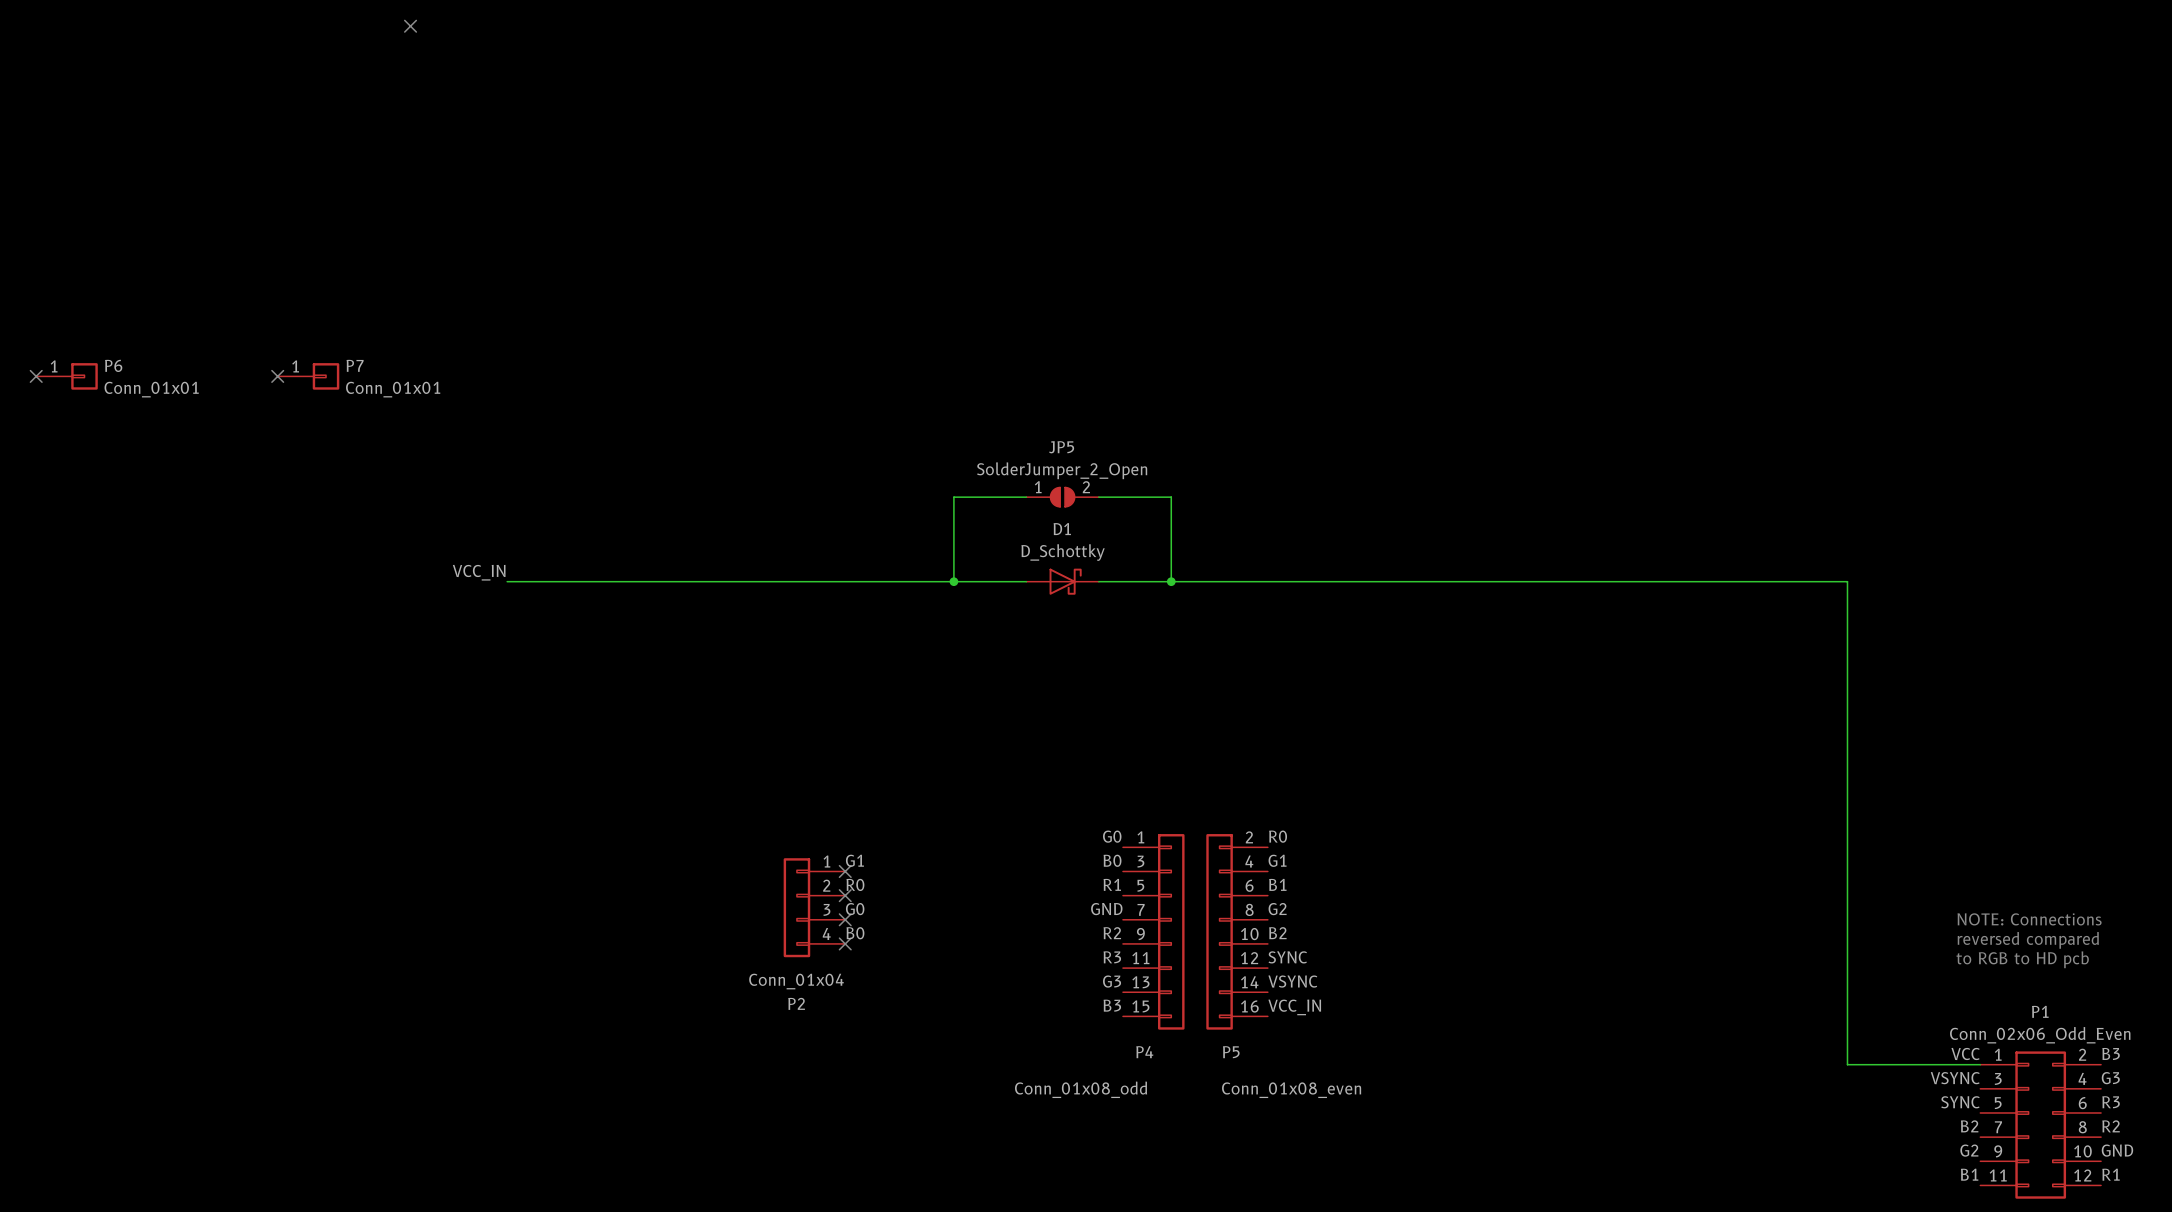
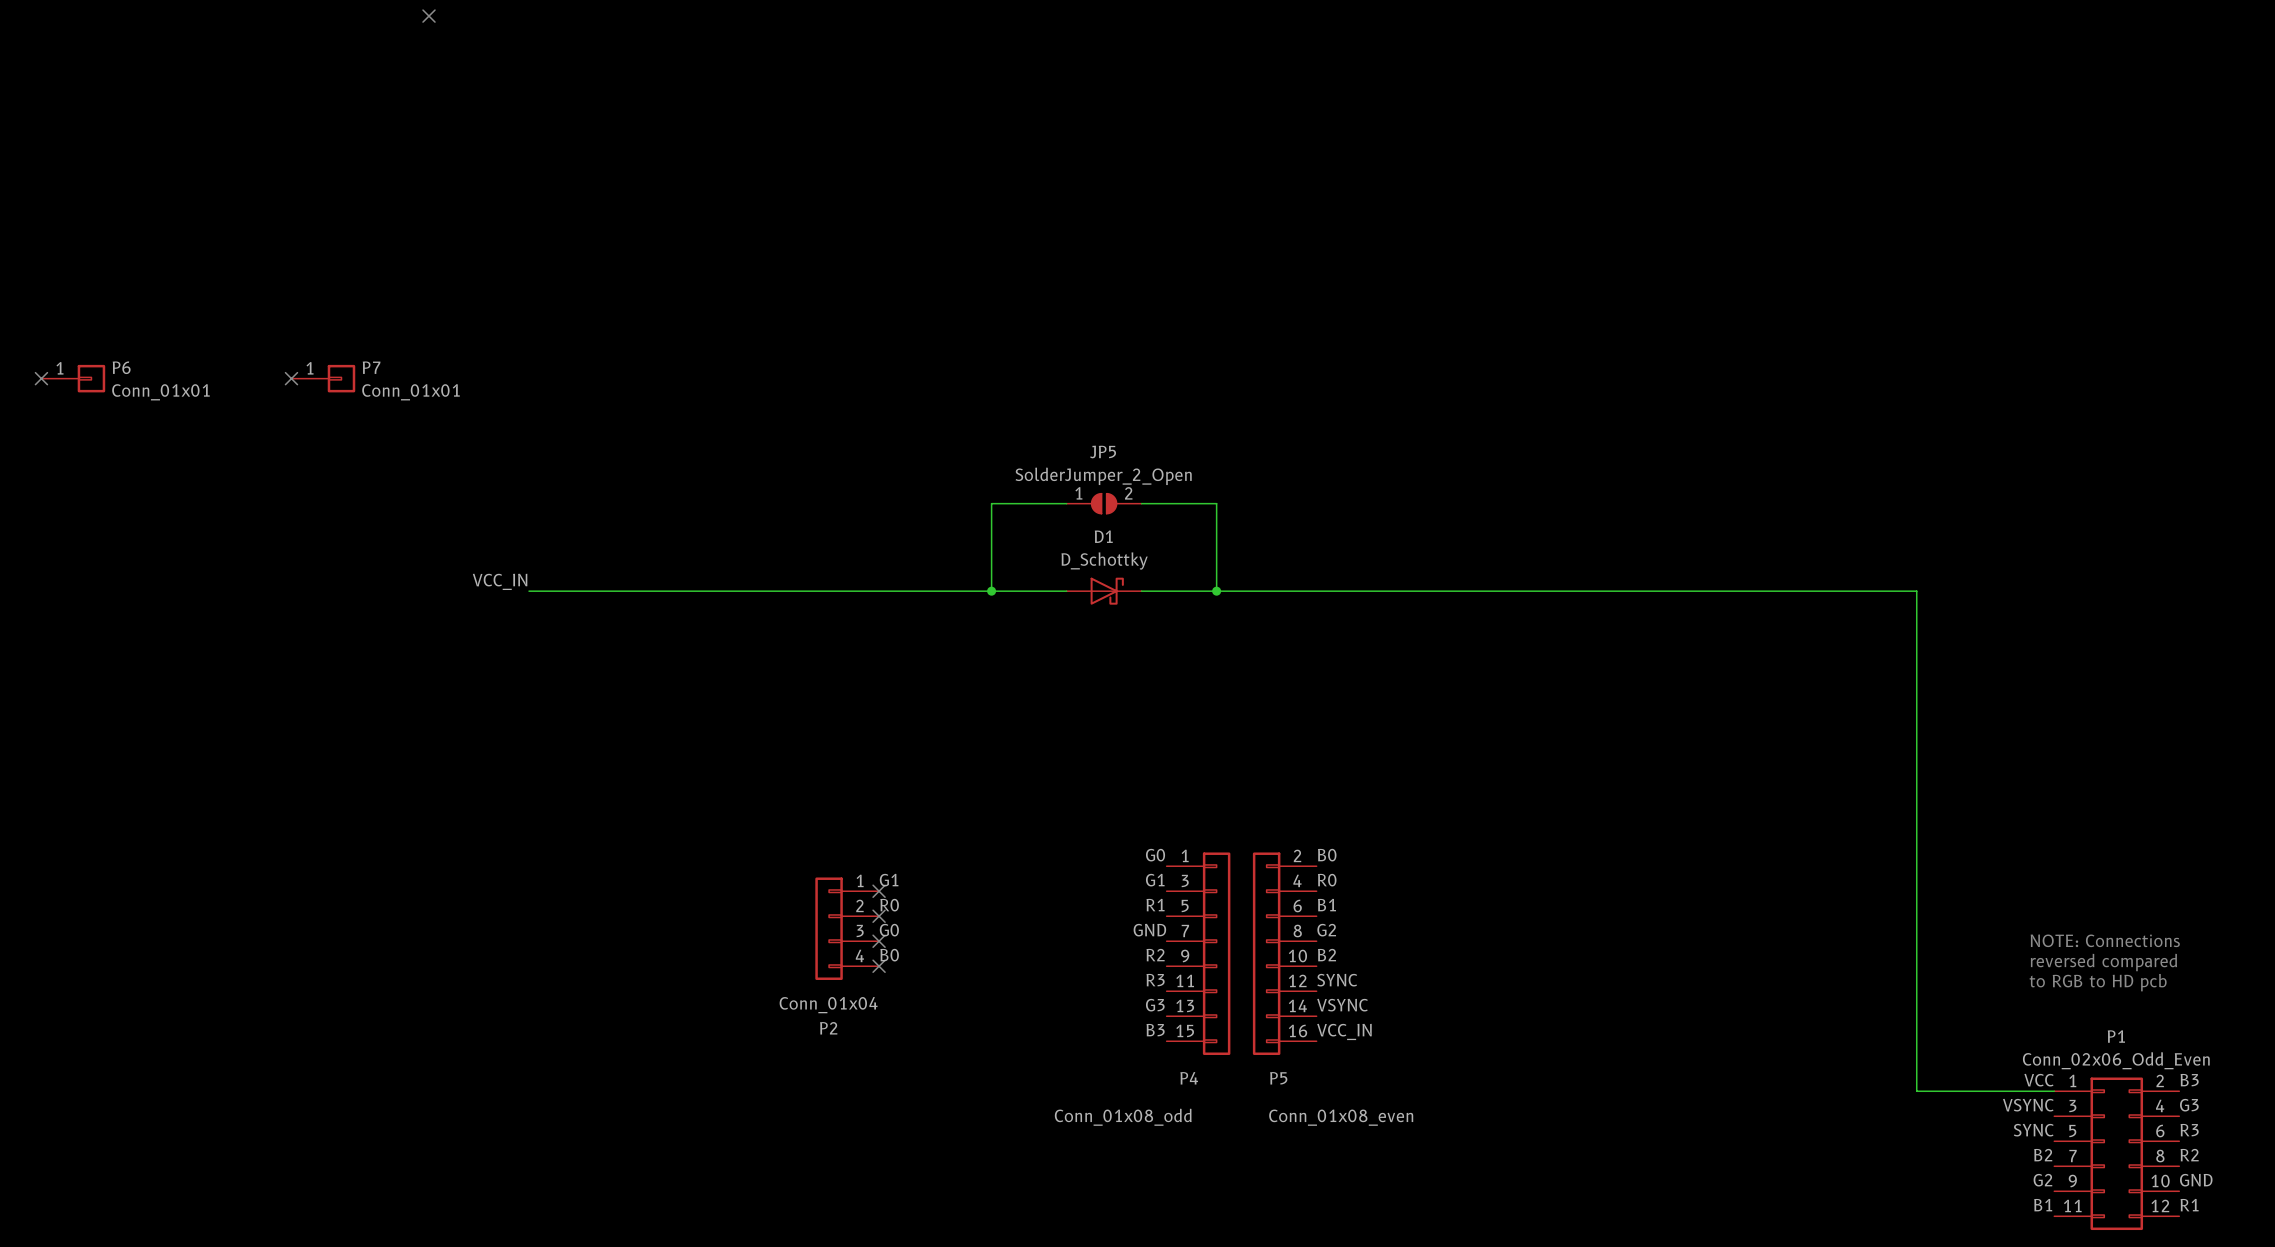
label: R0 (1278, 836) -> B0 (1327, 855)
label: B0 (1112, 860) -> G1 (1155, 880)
label: G1 (1277, 860) -> R0 (1327, 880)

